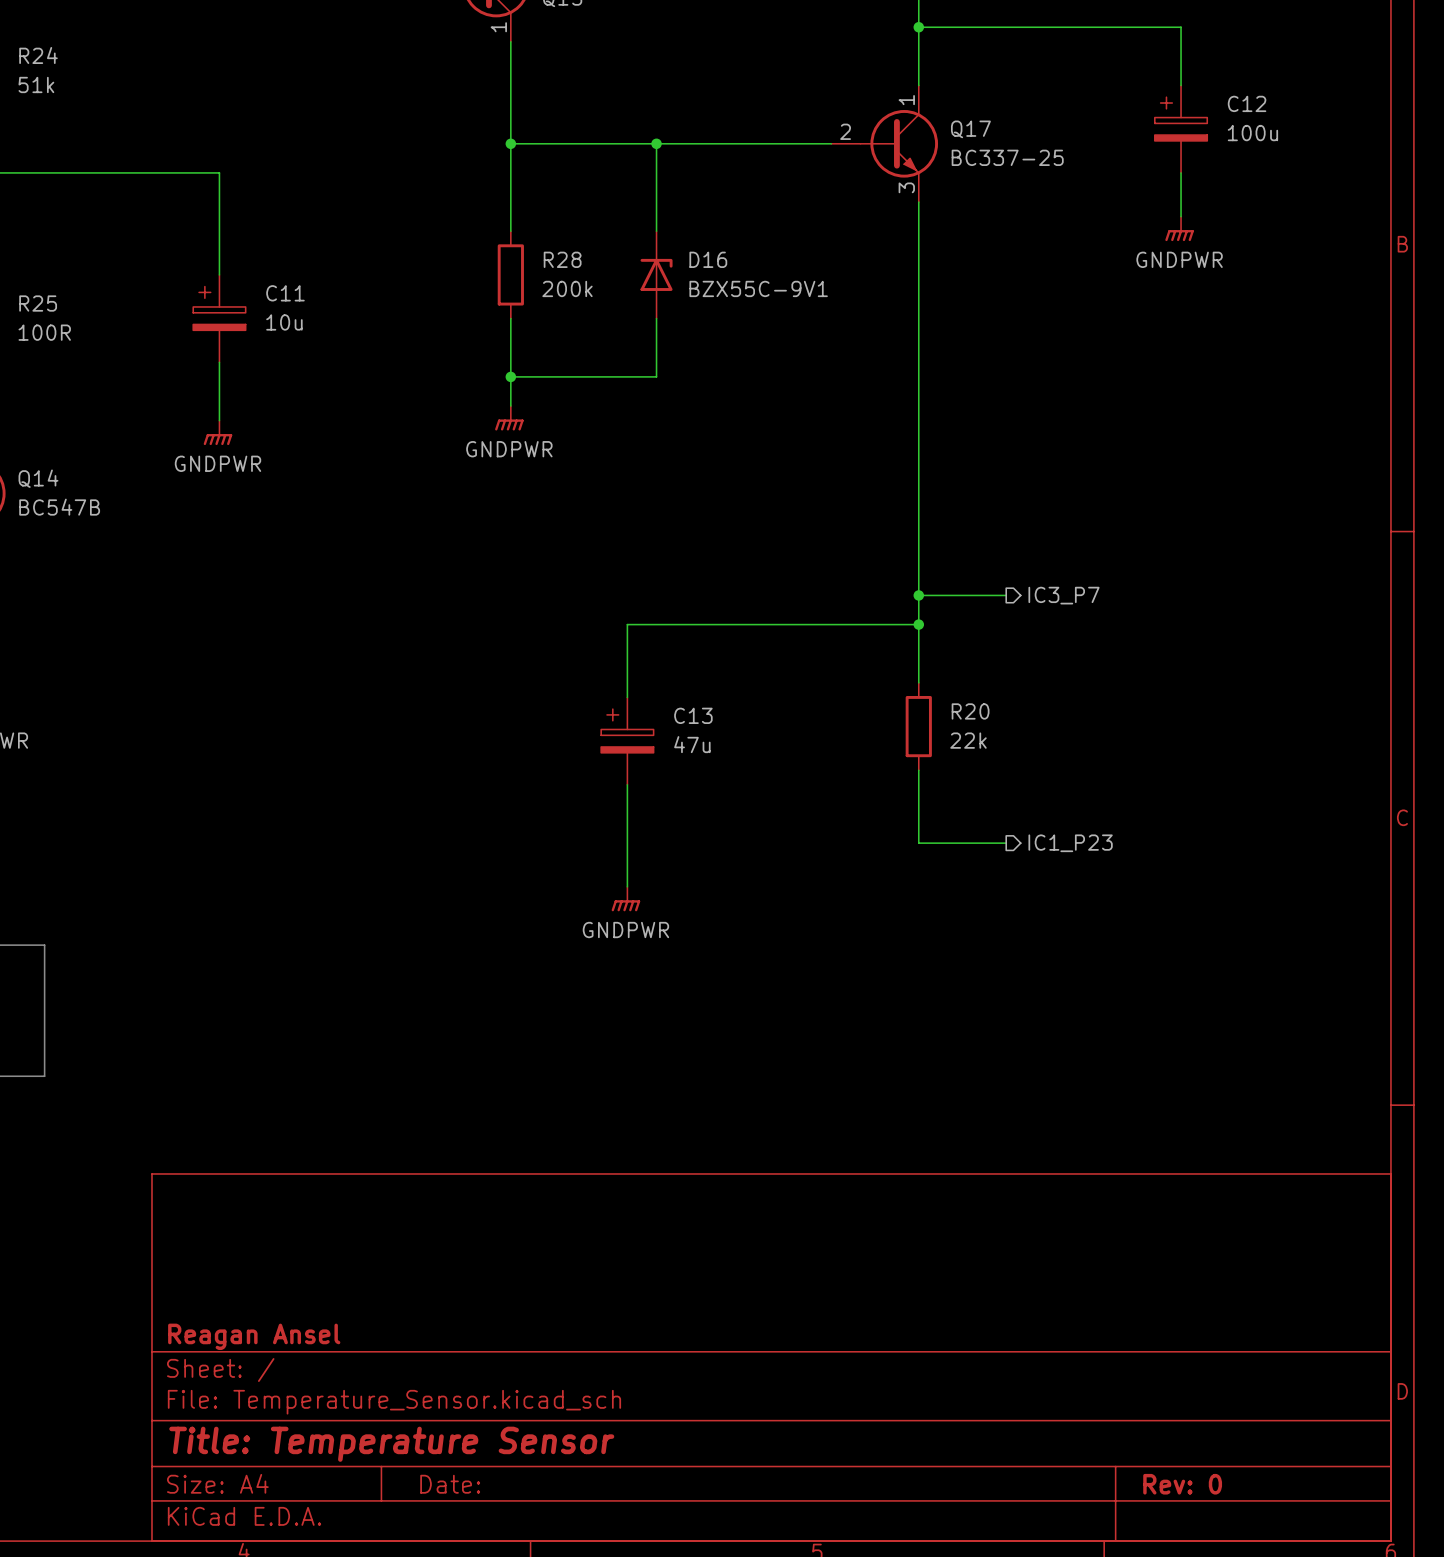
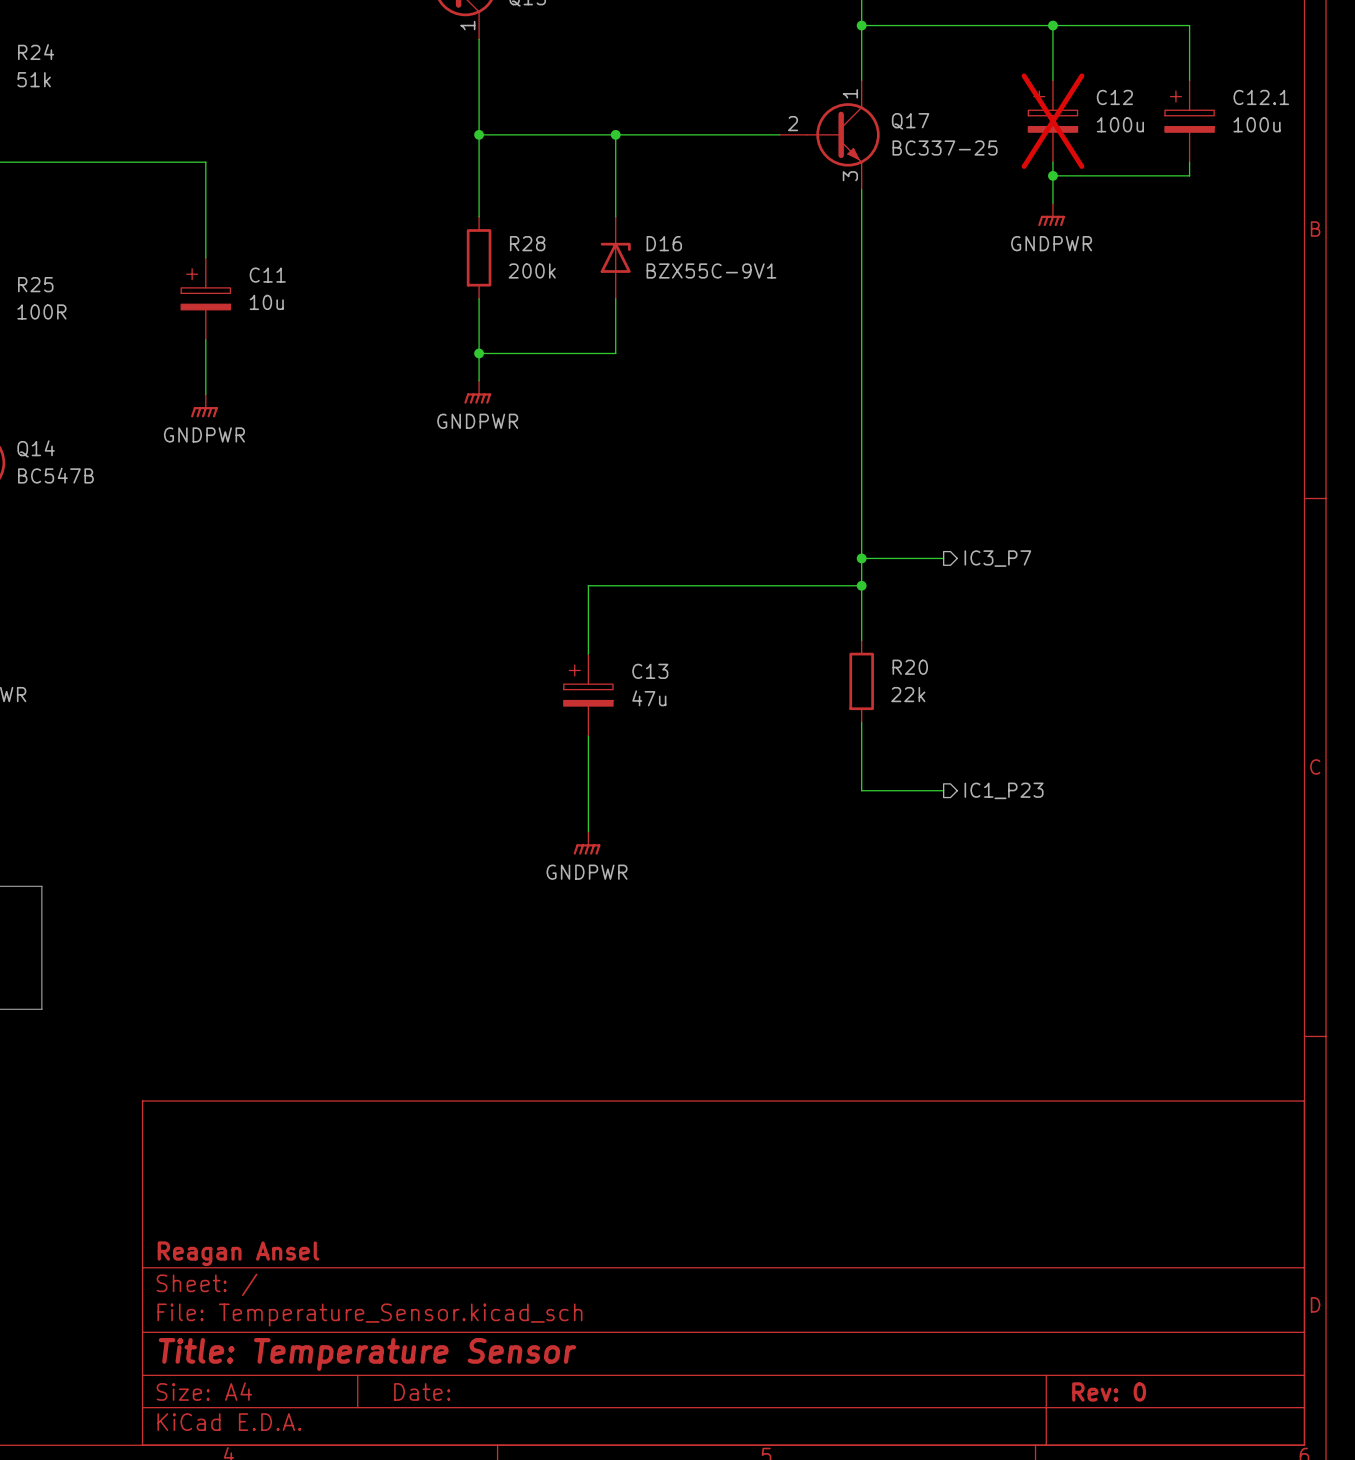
wire: none -> (1052, 25) (1052, 80)
junction: none -> (1052, 25)
wire: (1181, 27) (1181, 85) -> (1107, 25) (1189, 25) (1189, 80)
C12 do-not-place cross: none -> (1052, 121)
C12 position: (1181, 129) -> (1052, 121)
C12.1: none -> 100u (1189, 121)
wire: (1181, 172) (1181, 216) -> (1052, 162) (1052, 203)
wire: none -> (1189, 162) (1189, 175) (1052, 175)
junction: none -> (1052, 175)
power symbol position: GNDPWR (1179, 228) -> GNDPWR (1051, 214)

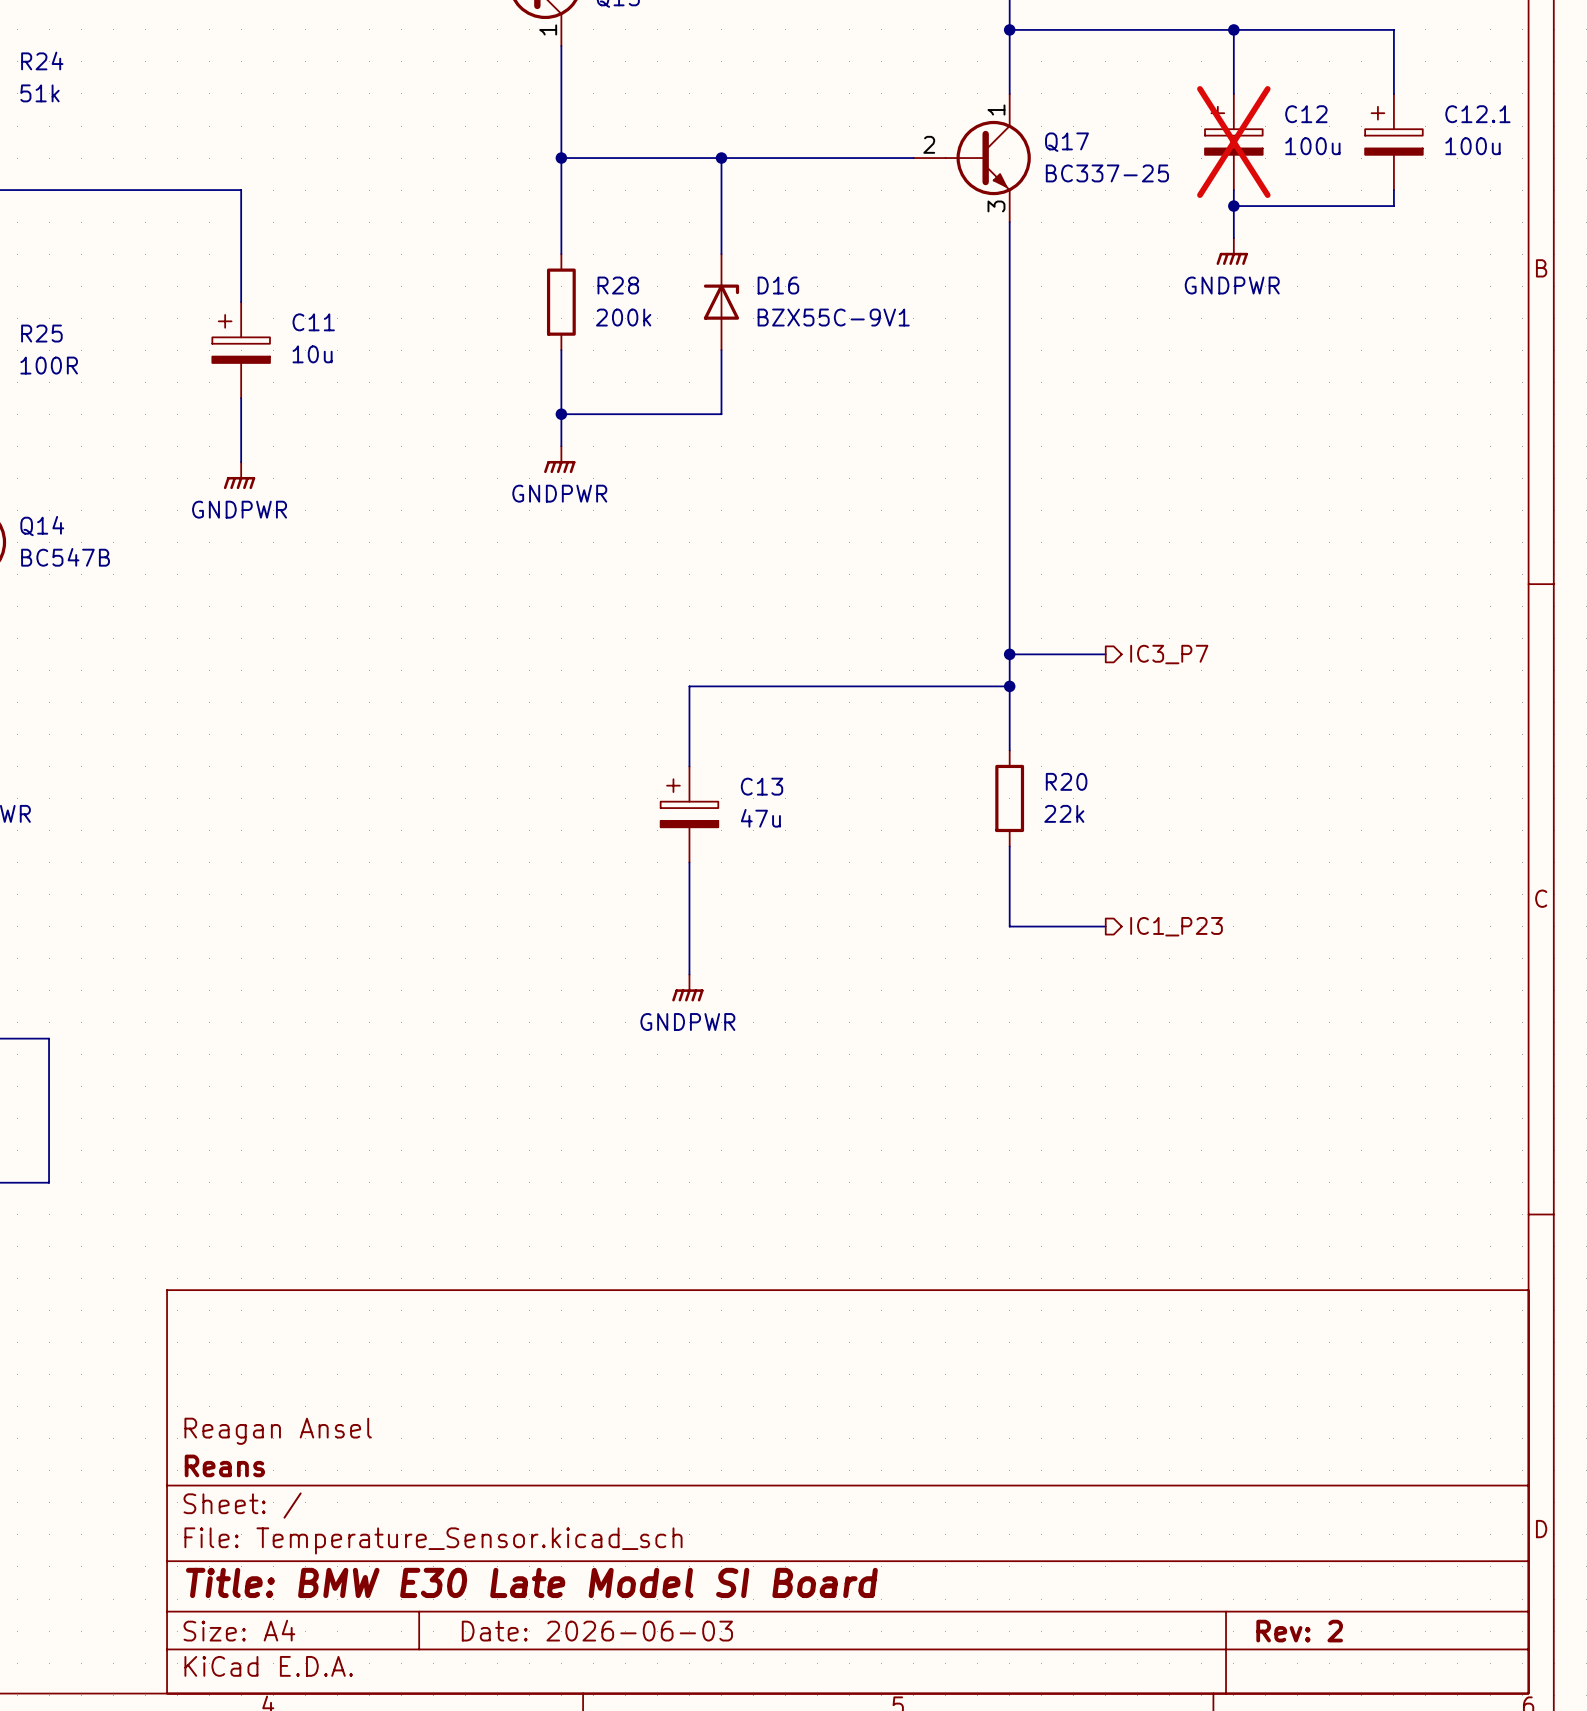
title block: none -> Reagan Ansel (278, 1431)
title block: Reagan Ansel (238, 1253) -> Reans (224, 1465)
title block: Title: Temperature Sensor (367, 1354) -> Title: BMW E30 Late Model SI Board (531, 1582)
title block: Date: (422, 1391) -> Date: 2026-06-03 (597, 1631)
title block: Rev: 0 (1109, 1391) -> Rev: 2 (1299, 1631)

